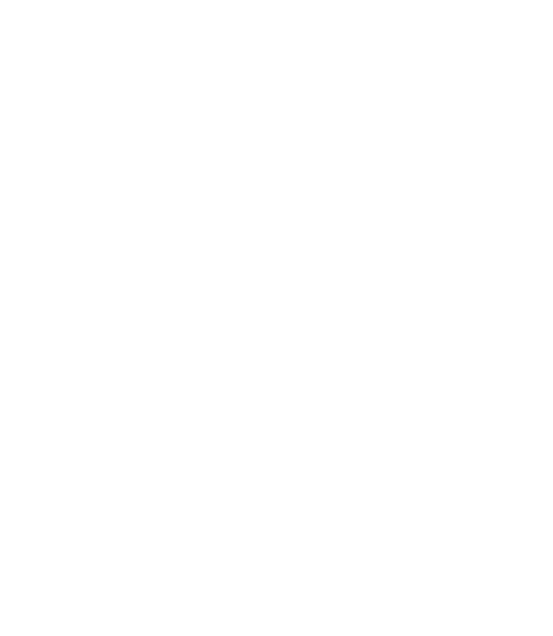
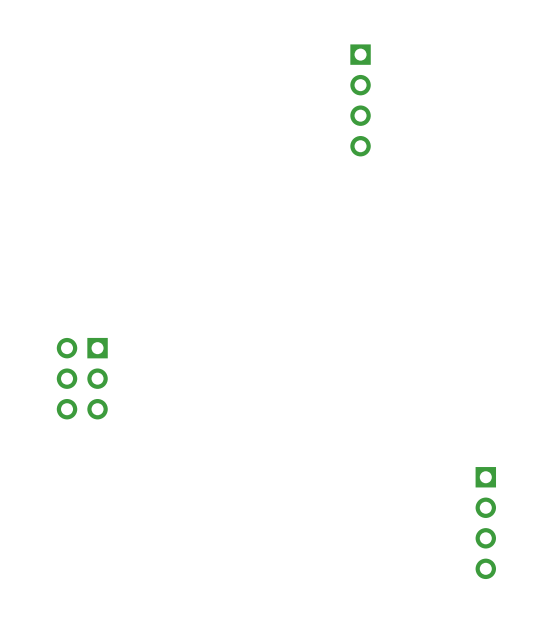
part: none -> (360, 100)
part: none -> (82, 378)
part: none -> (485, 523)

